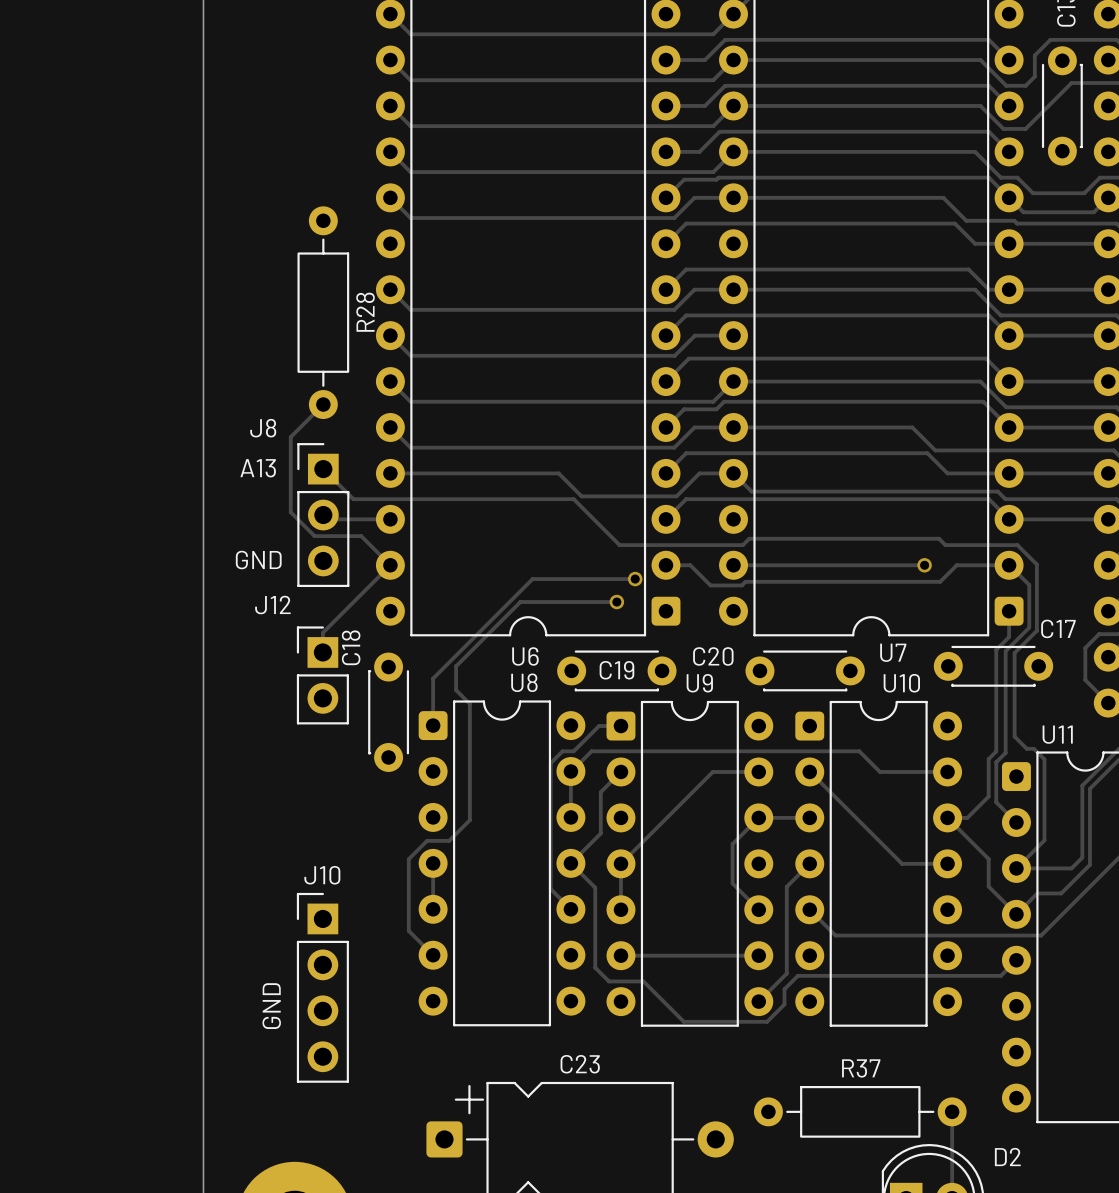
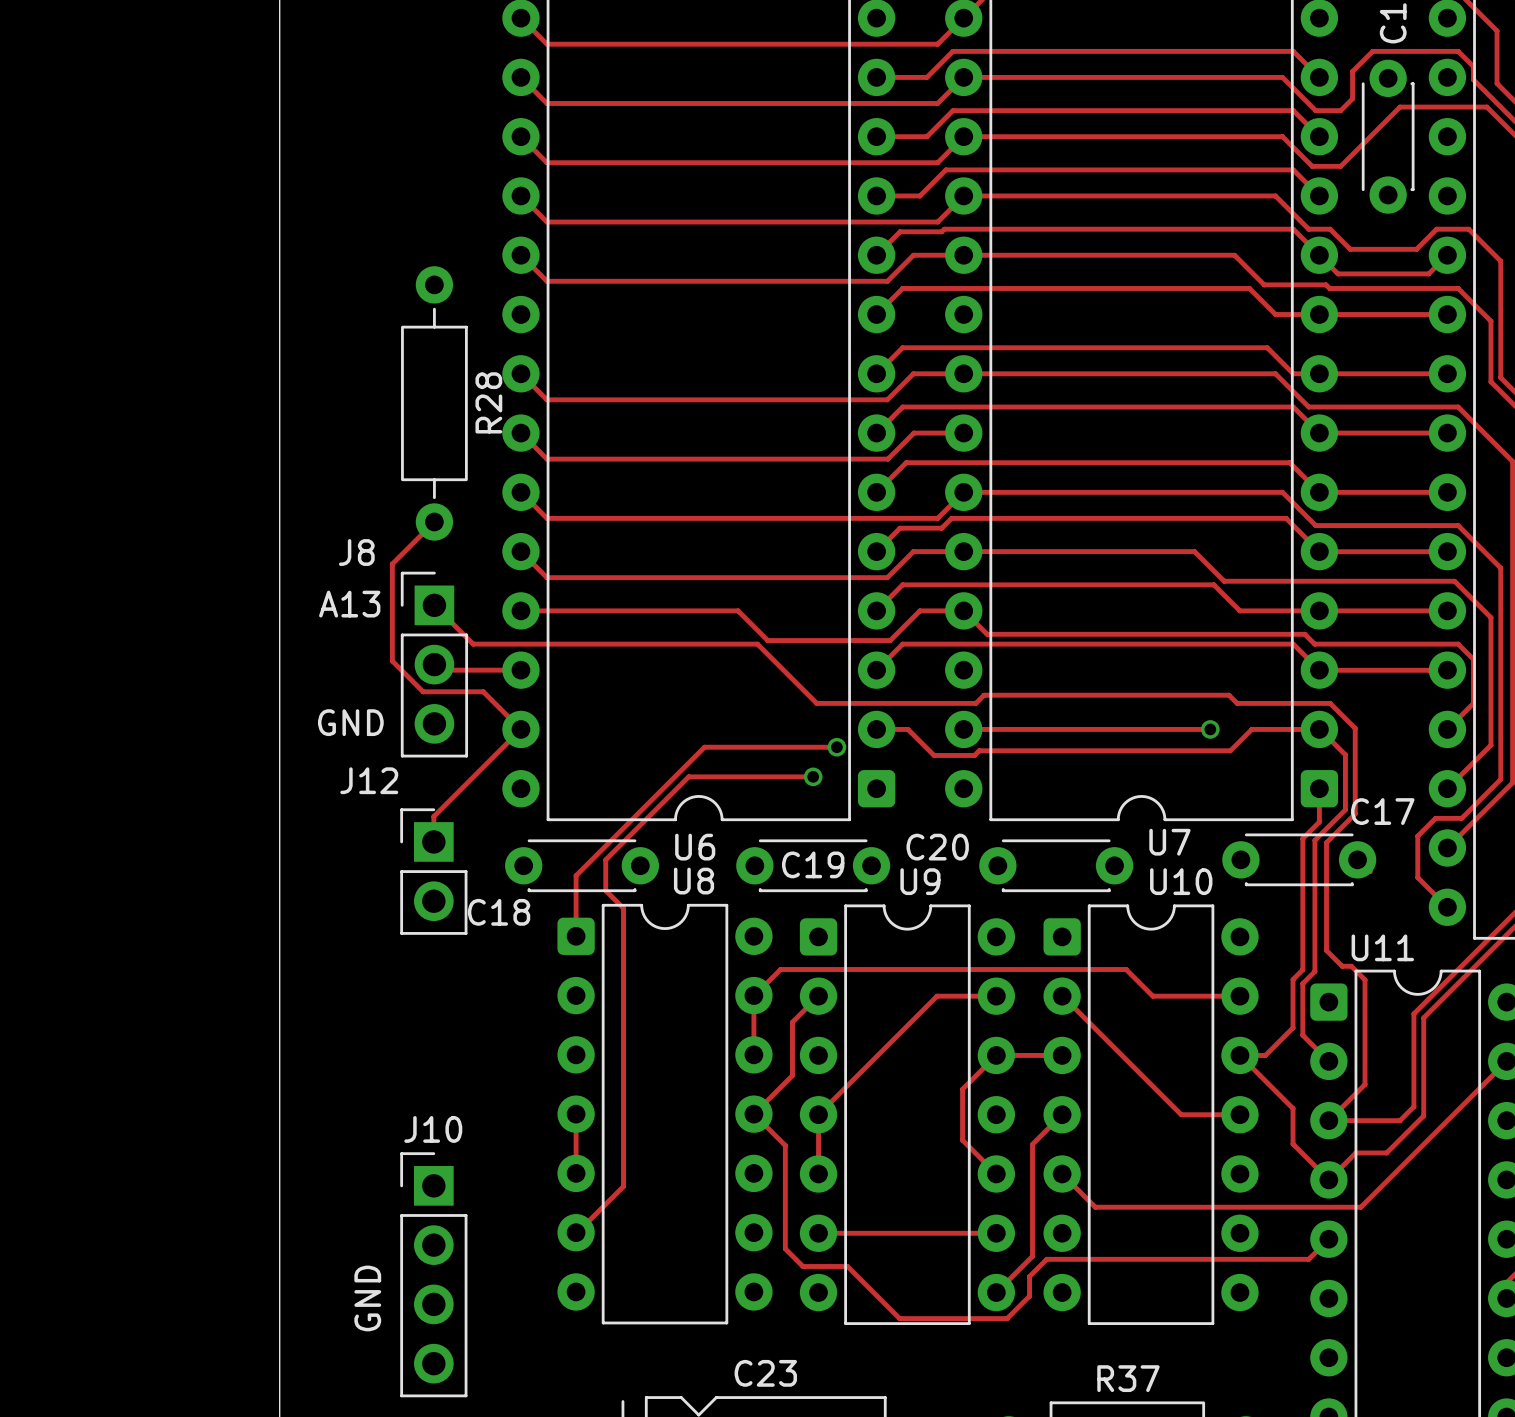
C18 rotation: 0° (388, 712) -> 90° counterclockwise (582, 865)
track: (620, 726) (599, 726) (573, 751) (562, 751) (550, 763) (550, 889) (570, 909) -> none
track: (469, 820) (449, 840) (427, 840) (408, 859) (408, 930) (433, 955) -> (623, 1058) (623, 1186) (576, 1232)

